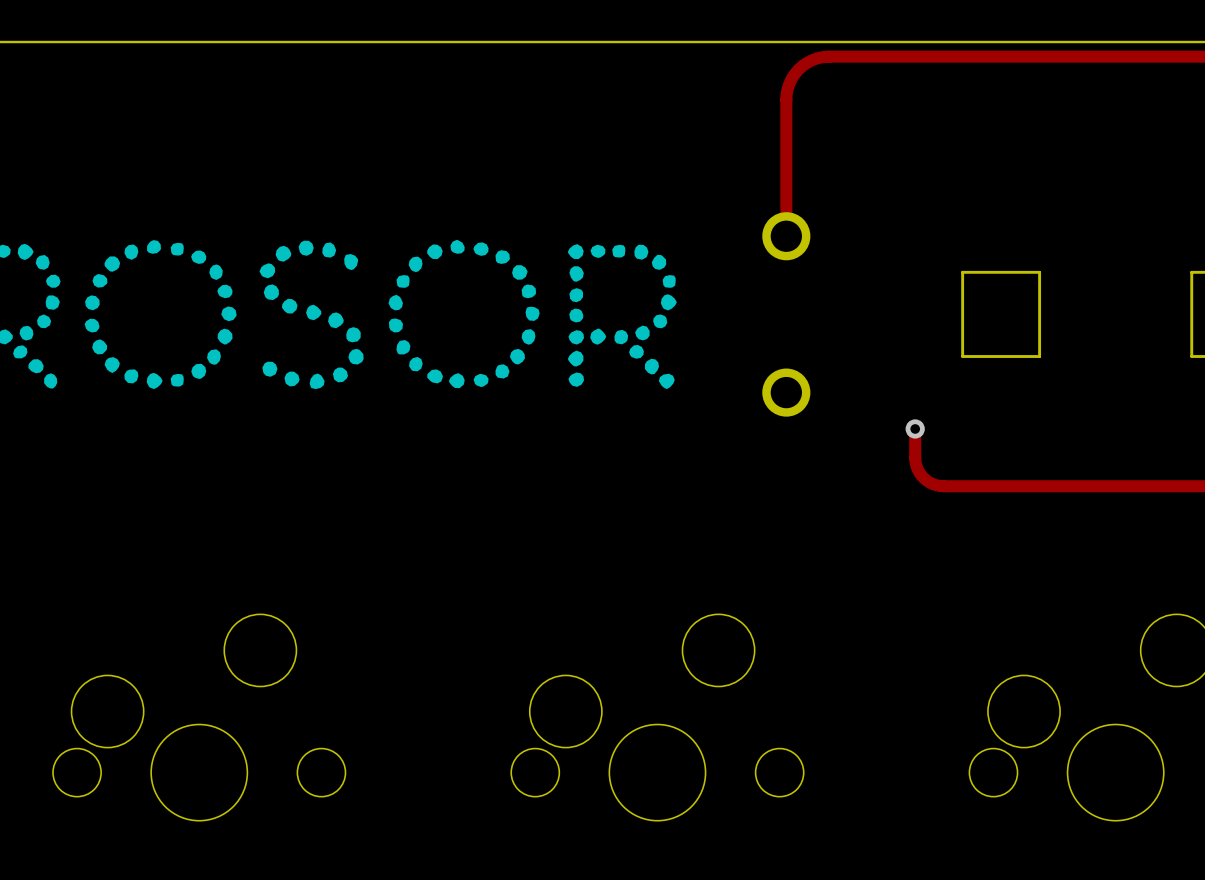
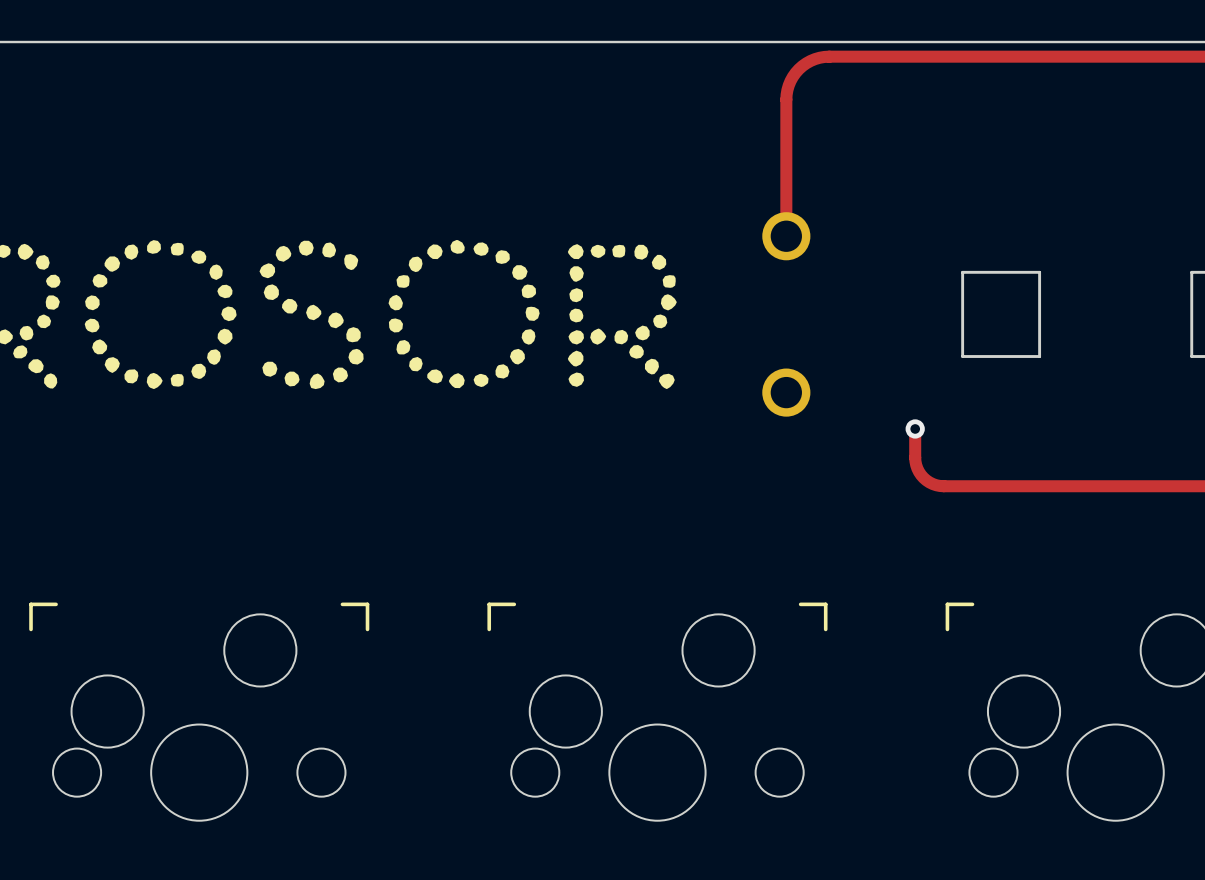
line: none -> (56, 604) (31, 604) (31, 629)
line: none -> (342, 604) (367, 604) (367, 629)
line: none -> (514, 604) (489, 604) (489, 629)
line: none -> (800, 604) (825, 604) (825, 629)
line: none -> (972, 604) (947, 604) (947, 629)

